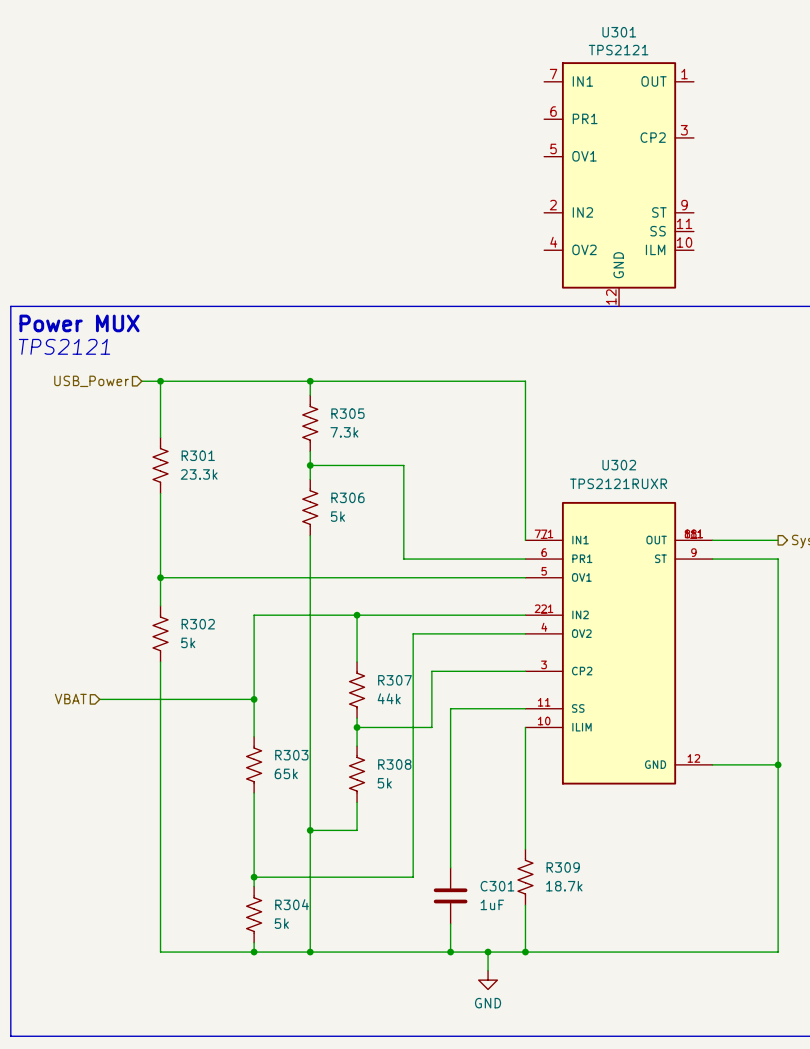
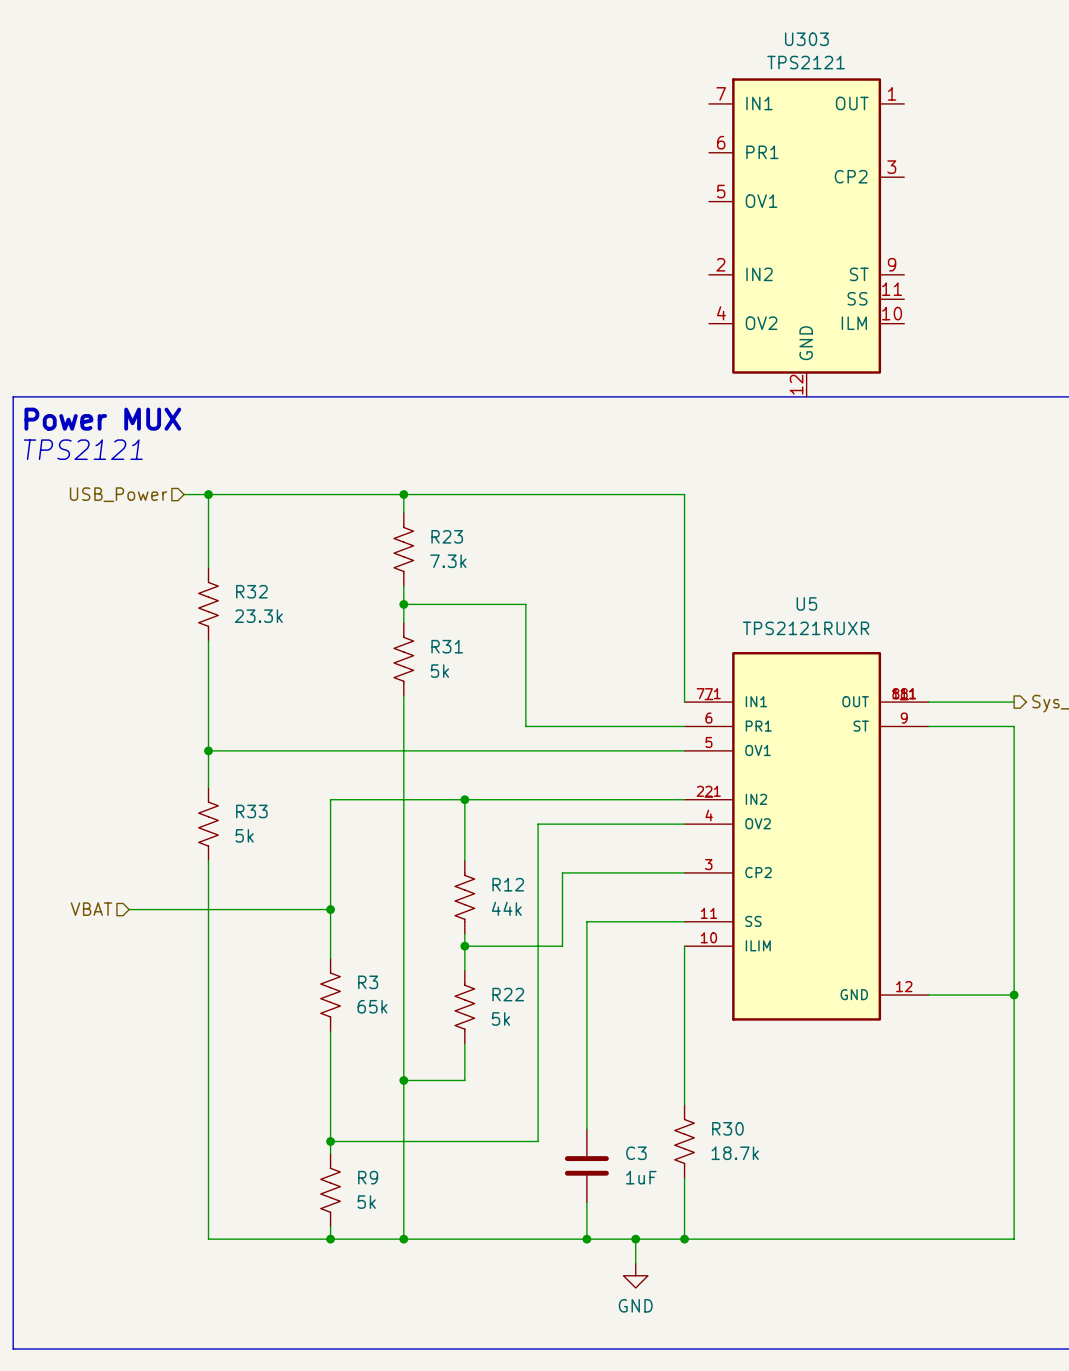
U301 name: U301 (619, 32) -> U303 (806, 39)
R305 name: R305 (347, 413) -> R23 (447, 536)
R301 name: R301 (198, 455) -> R32 (251, 591)
U302 name: U302 (619, 465) -> U5 (806, 603)
R306 name: R306 (347, 497) -> R31 (447, 646)
R302 name: R302 (198, 624) -> R33 (251, 811)
R307 name: R307 (394, 680) -> R12 (508, 884)
R303 name: R303 (291, 755) -> R3 (368, 982)
R308 name: R308 (394, 764) -> R22 (508, 994)
R309 name: R309 (563, 867) -> R30 (727, 1128)
C301 name: C301 (497, 886) -> C3 (636, 1153)
R304 name: R304 (292, 904) -> R9 (368, 1177)

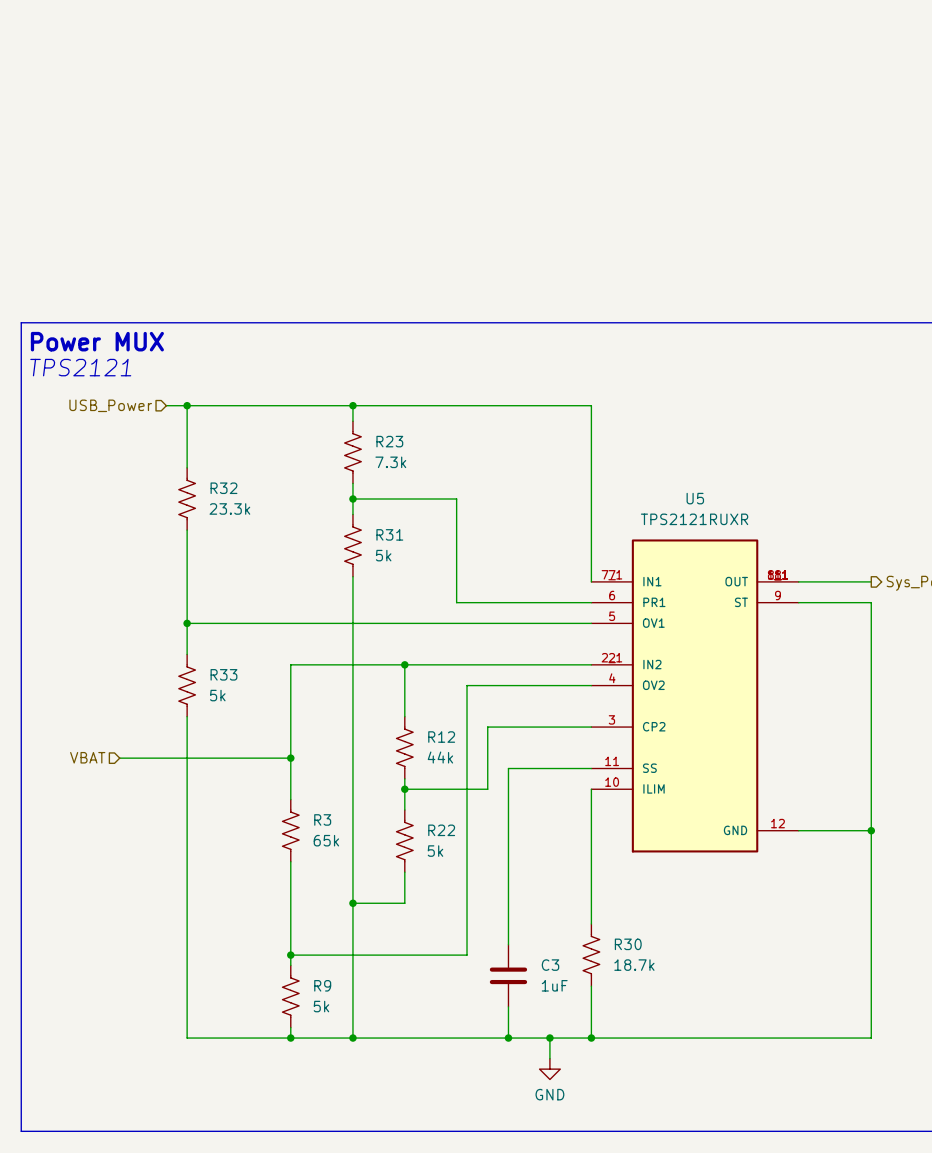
U303: TPS2121 (806, 237) -> none

